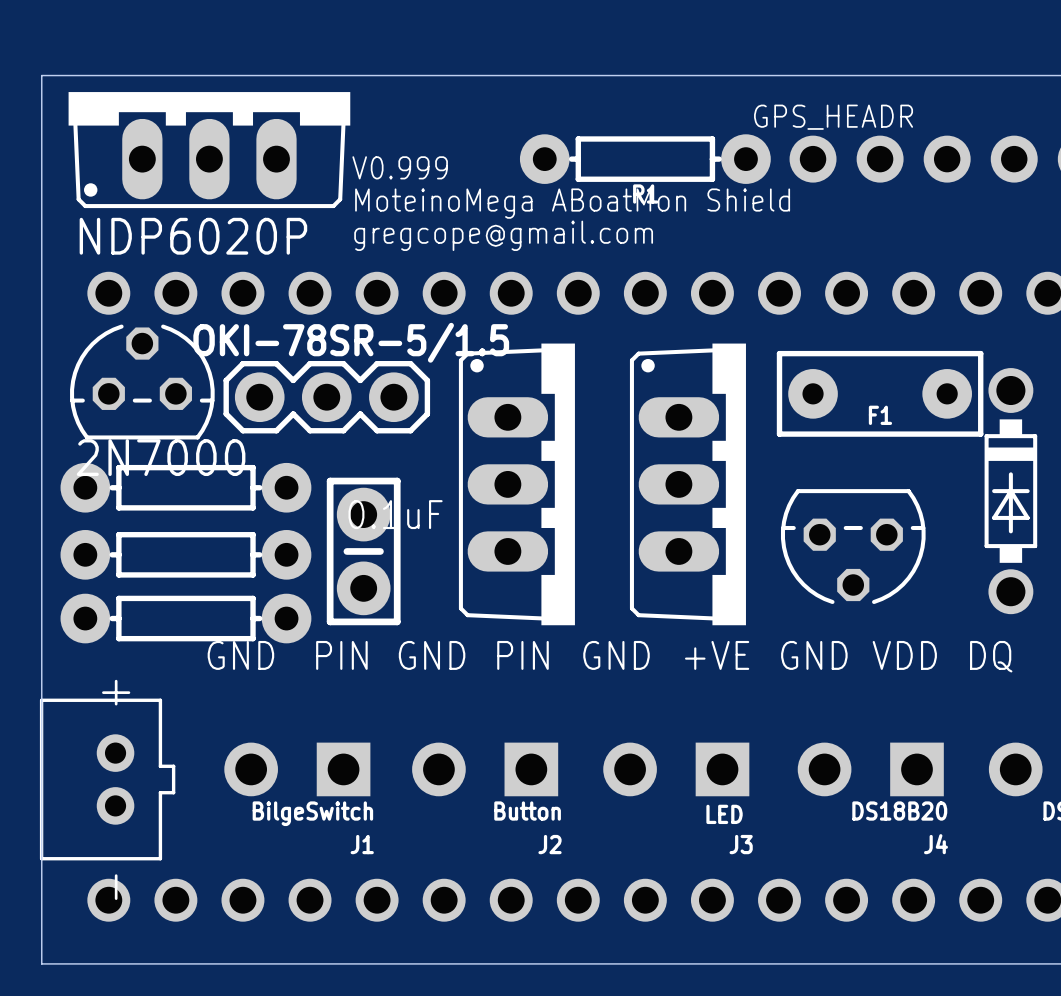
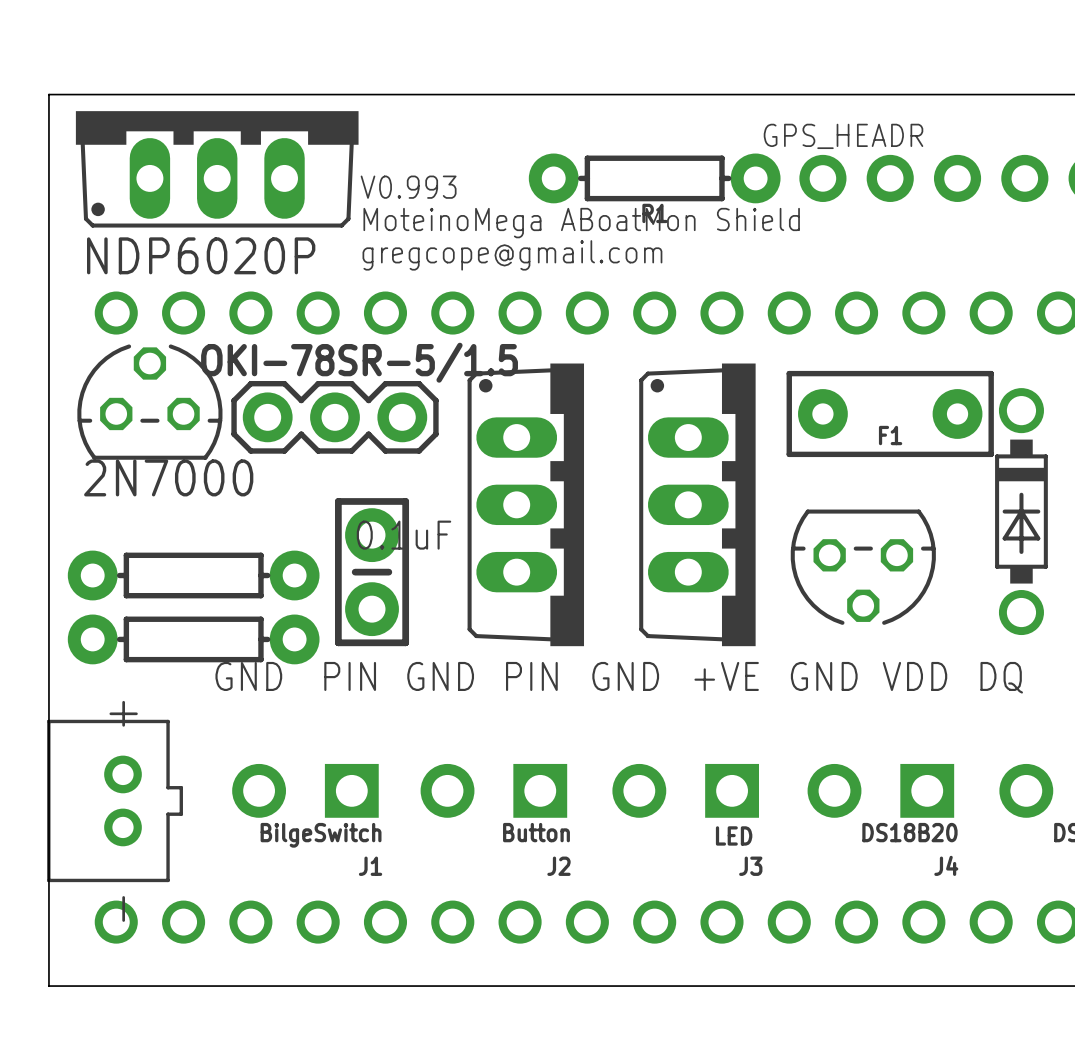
text: V0.999 (400, 167) -> V0.993 (408, 187)
part: (185, 487) -> none

